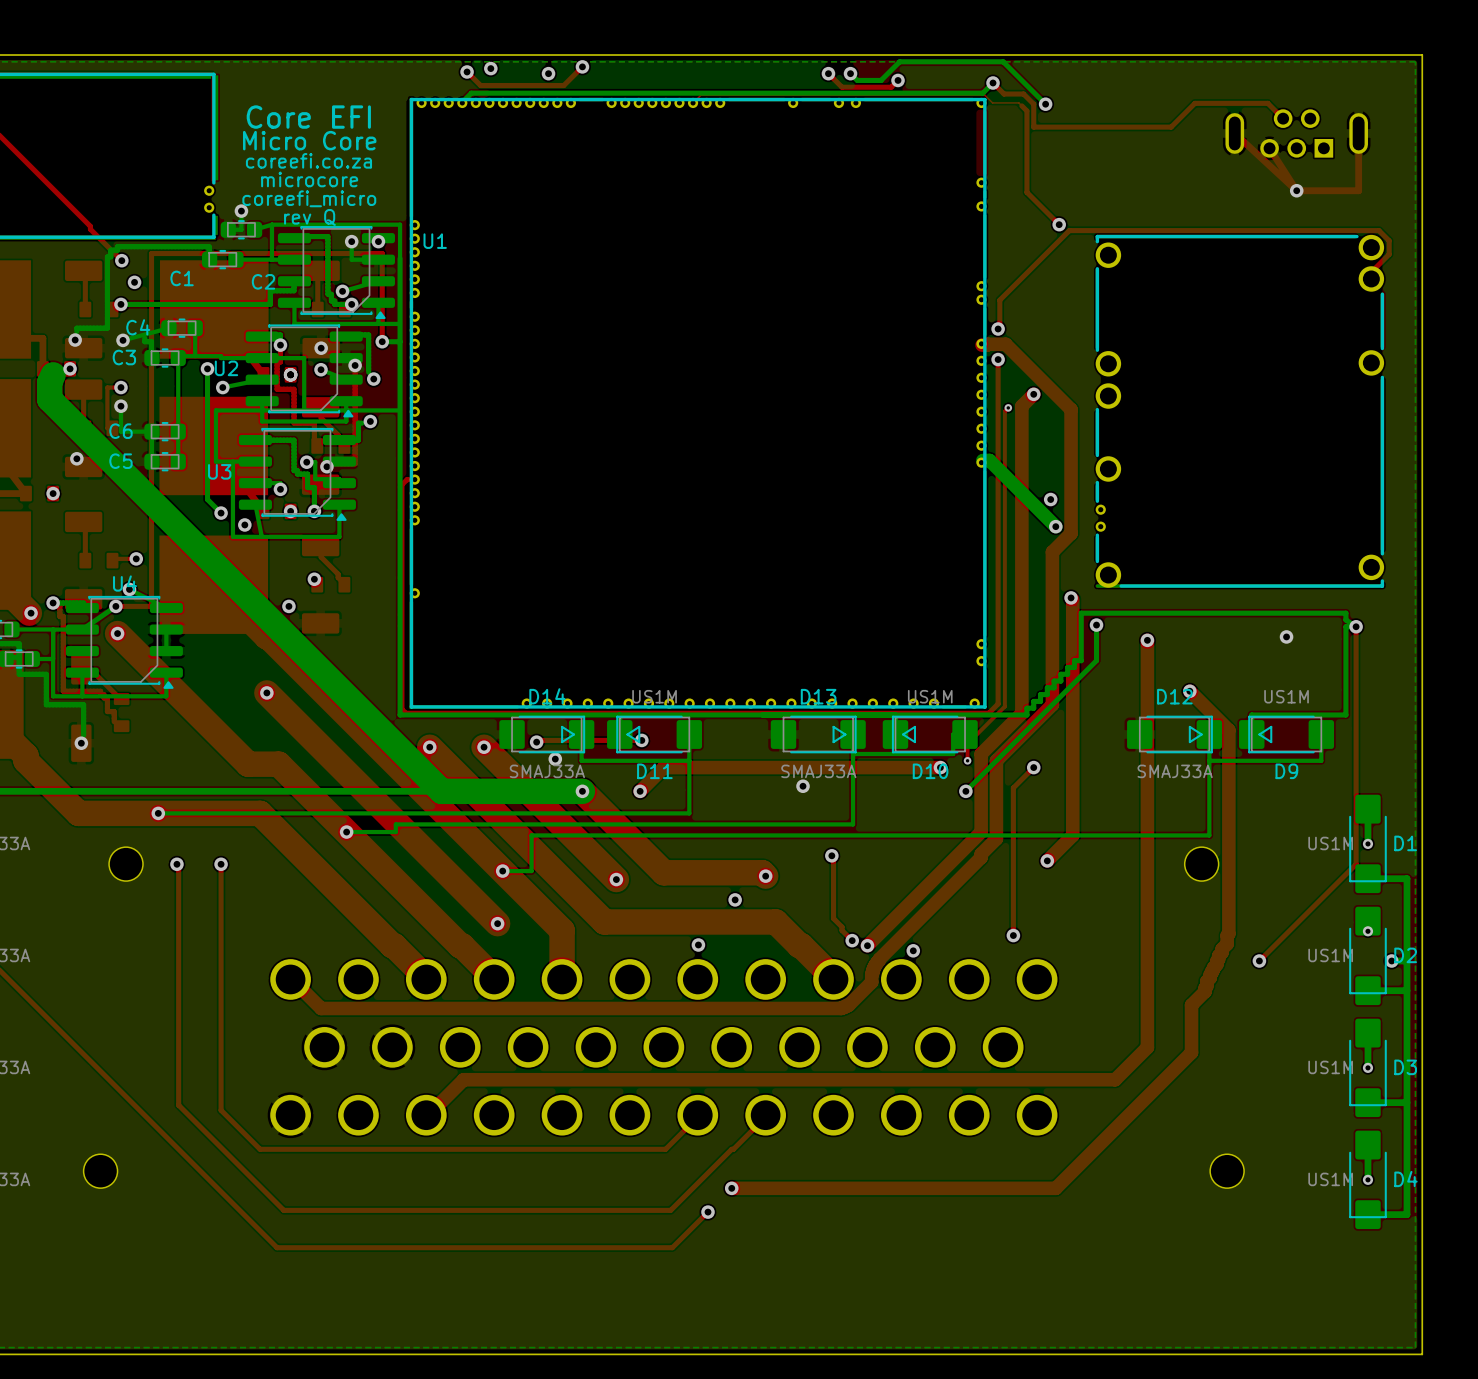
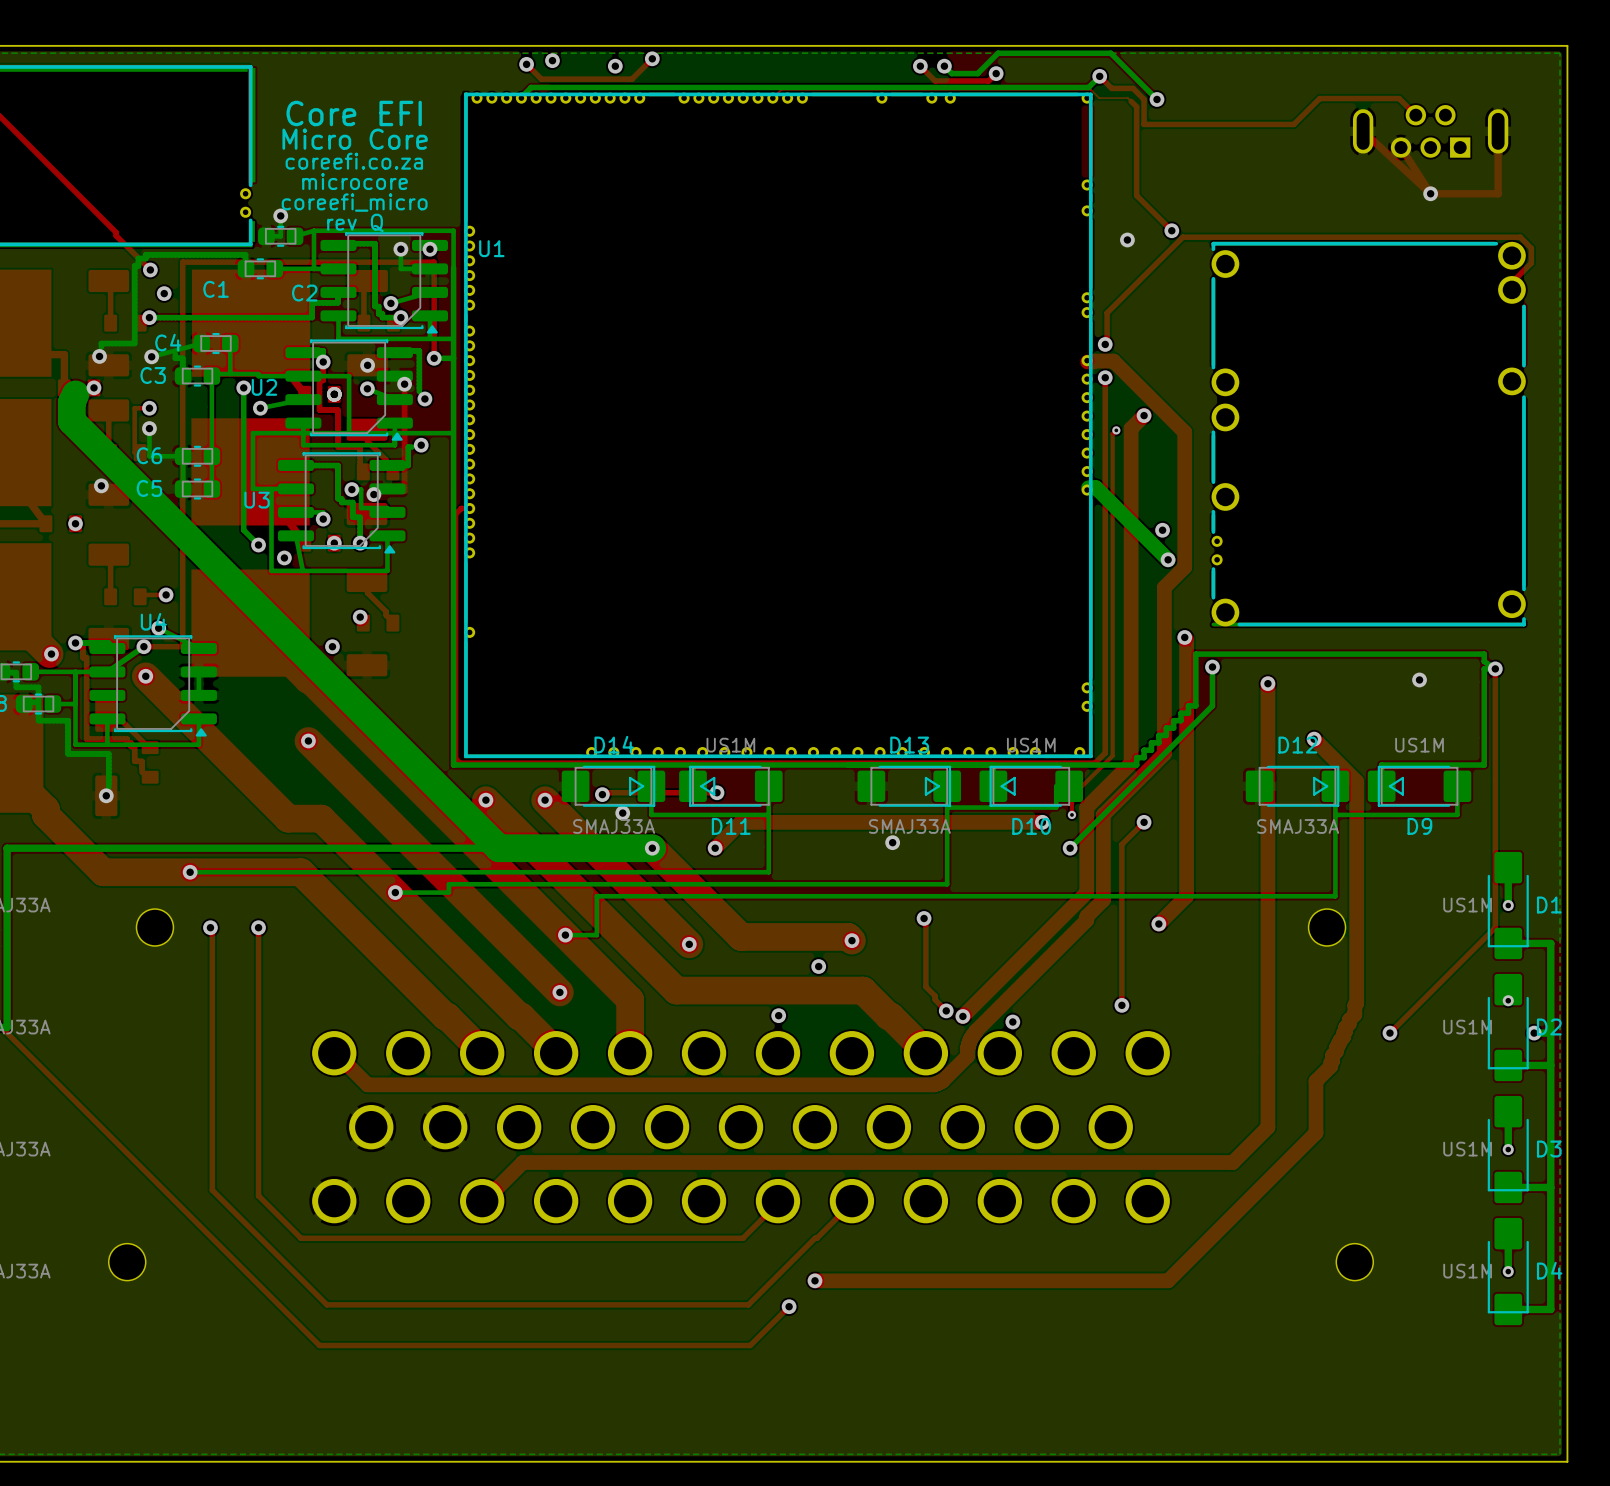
via: none -> (1127, 239)

